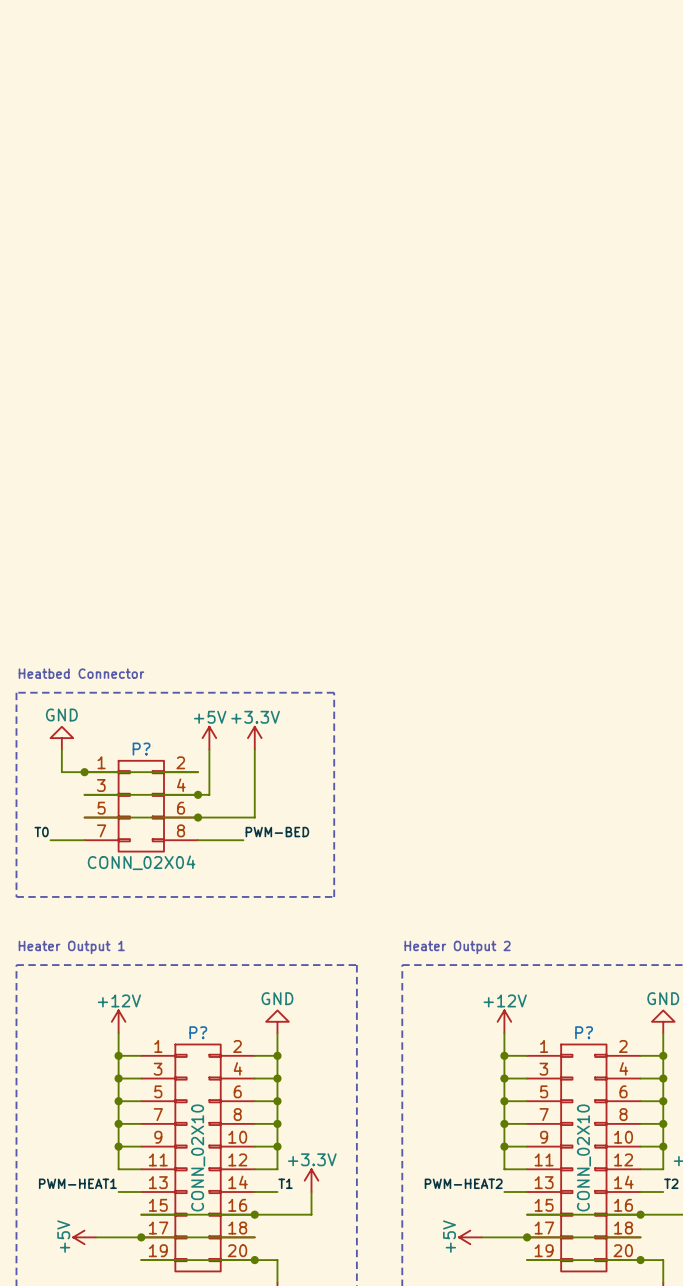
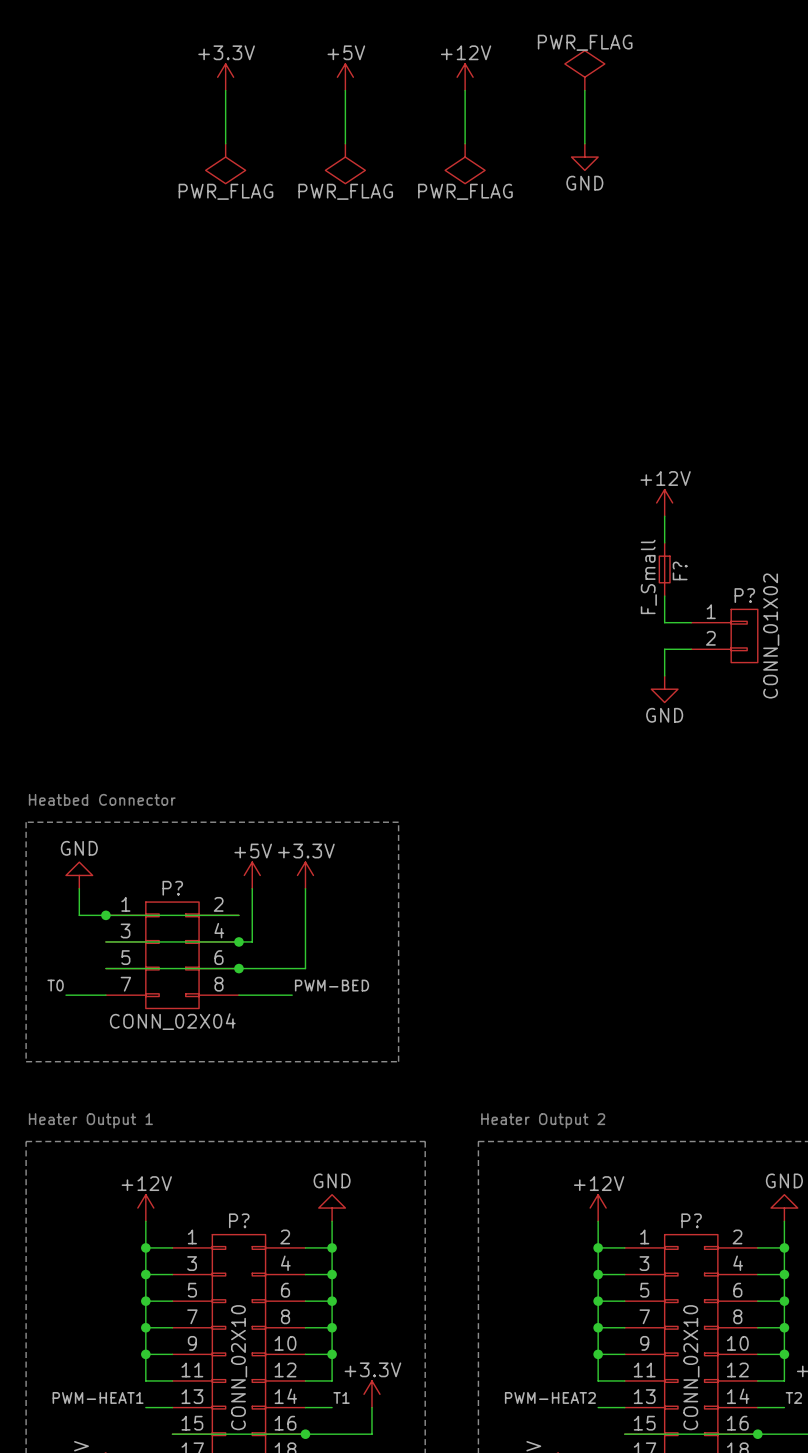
power symbol: none -> PWR_FLAG (584, 70)
power symbol: none -> +3.3V (225, 77)
power symbol: none -> +5V (345, 77)
power symbol: none -> +12V (465, 77)
wire: none -> (225, 90) (225, 143)
wire: none -> (345, 90) (345, 143)
wire: none -> (465, 90) (465, 143)
wire: none -> (584, 90) (584, 143)
power symbol: none -> GND (584, 157)
power symbol: none -> PWR_FLAG (225, 163)
power symbol: none -> PWR_FLAG (345, 163)
power symbol: none -> PWR_FLAG (465, 163)
power symbol: none -> +12V (664, 502)
wire: none -> (664, 516) (664, 542)
F?: none -> F_Small (664, 569)
wire: none -> (664, 596) (664, 622) (691, 622)
P?: none -> CONN_01X02 (724, 635)
wire: none -> (691, 649) (664, 649) (664, 675)
power symbol: none -> GND (664, 689)

